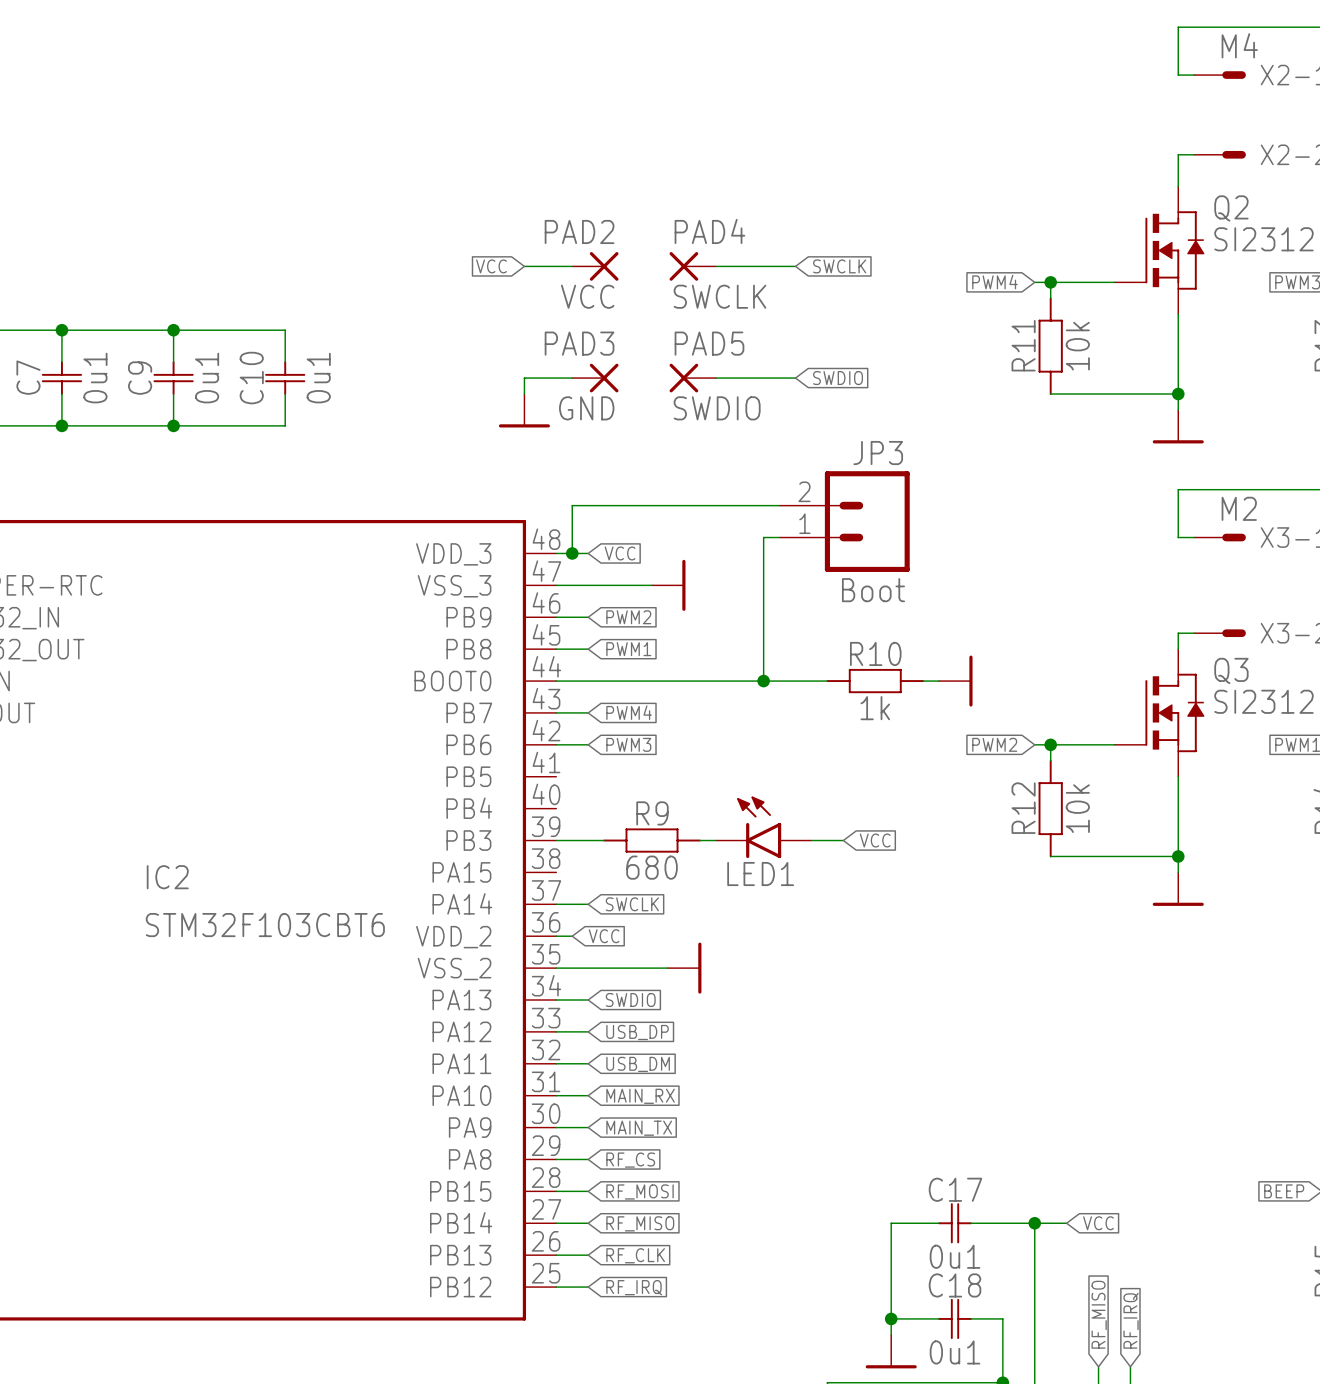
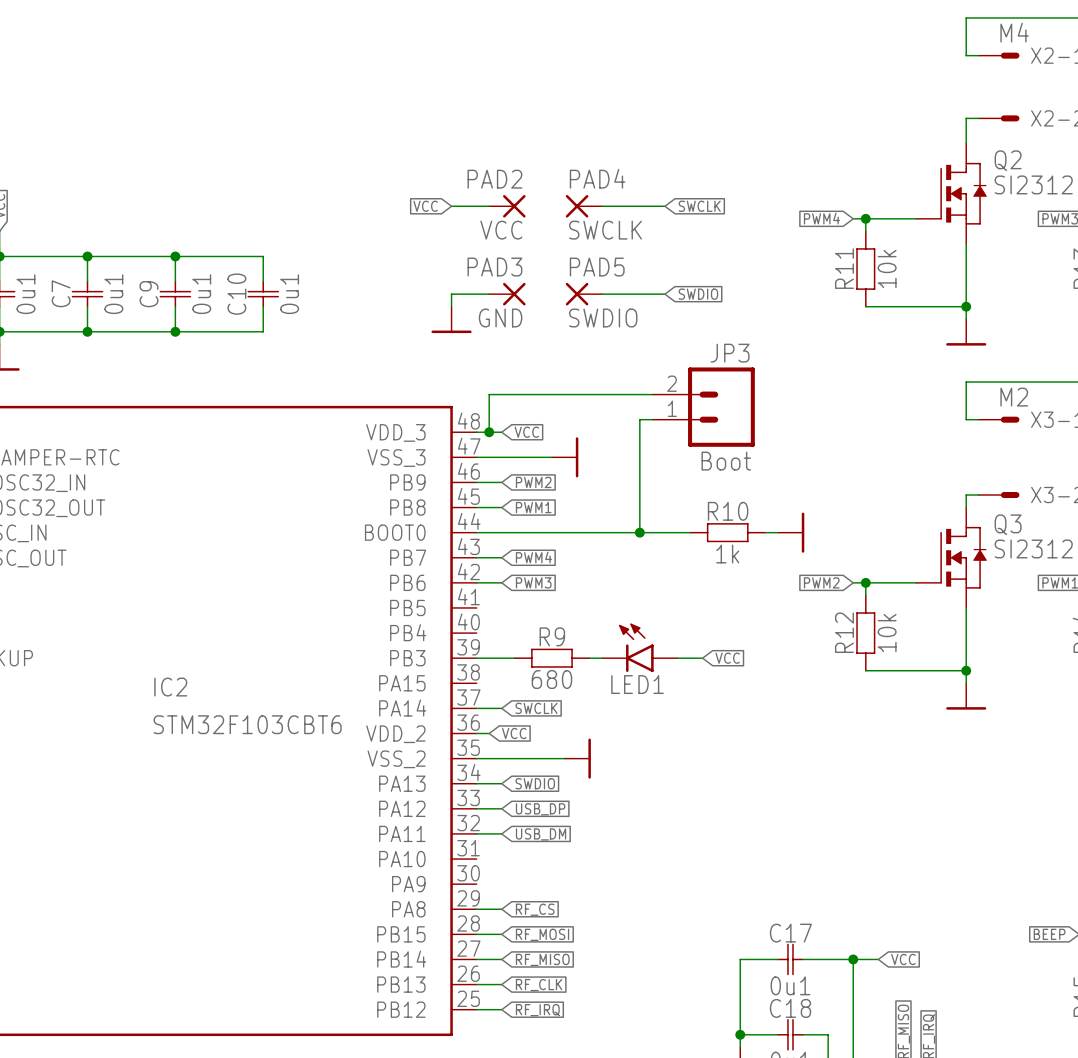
wire: (556, 1095) (588, 1095) -> none
global label: MAIN_RX (640, 1096) -> none
wire: (556, 1127) (588, 1127) -> none
global label: MAIN_TX (639, 1128) -> none

